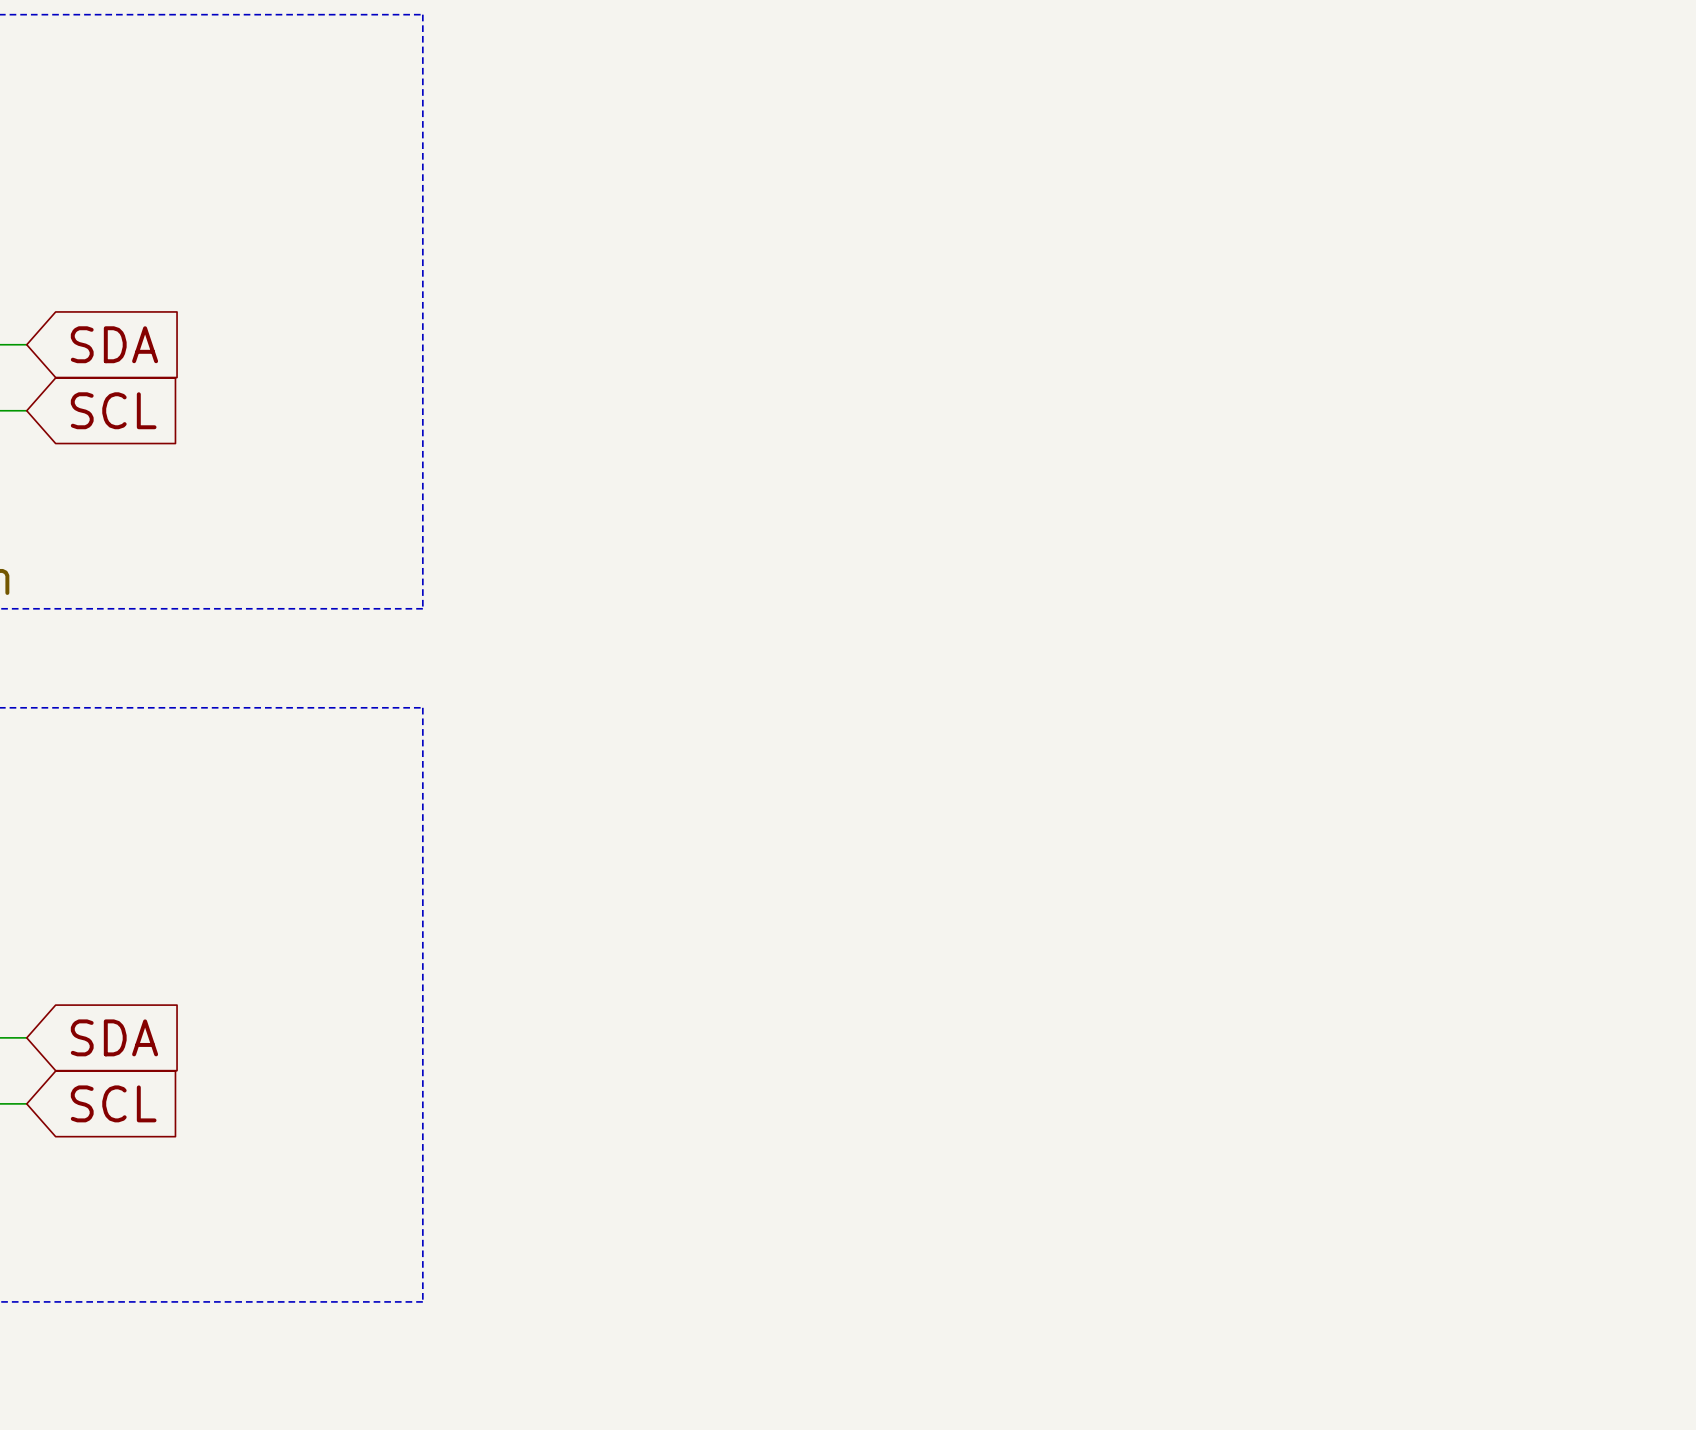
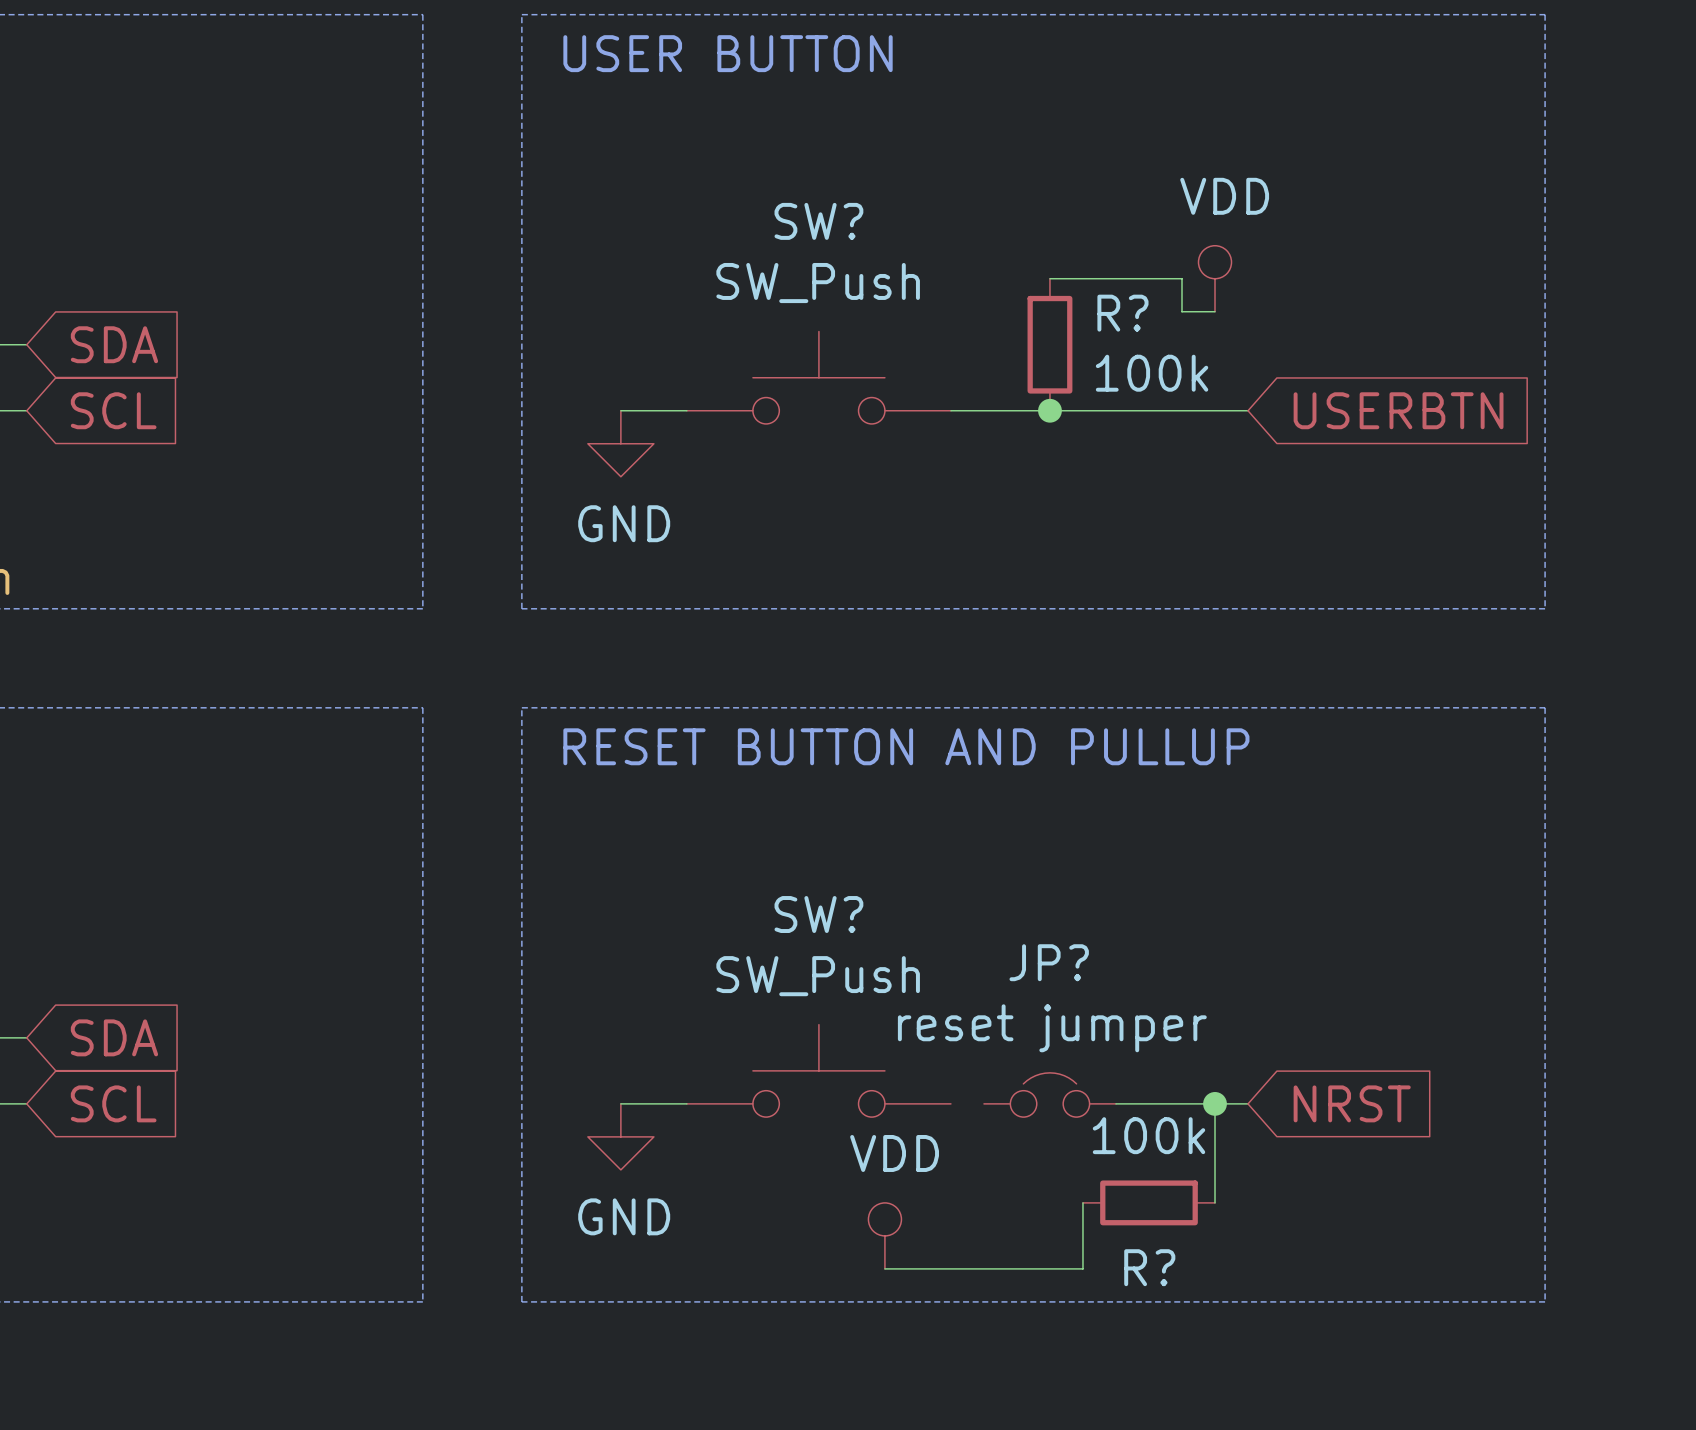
line: none -> (521, 14) (1545, 14) (1545, 608) (521, 608) (521, 14)
text: none -> USER BUTTON (728, 53)
wire: none -> (1049, 278) (1182, 278) (1182, 311) (1215, 311)
power symbol: none -> VDD (1215, 278)
R?: none -> 100k (1049, 344)
SW?: none -> SW_Push (818, 377)
wire: none -> (620, 410) (686, 410)
wire: none -> (950, 410) (1248, 410)
junction: none -> (1049, 410)
global label: none -> USERBTN (1398, 410)
power symbol: none -> GND (620, 443)
line: none -> (521, 707) (521, 1301) (1545, 1301) (1545, 707) (521, 707)
text: none -> RESET BUTTON AND PULLUP (906, 746)
SW?: none -> SW_Push (818, 1070)
JP?: none -> reset jumper (1049, 1094)
wire: none -> (620, 1103) (686, 1103)
wire: none -> (1115, 1103) (1248, 1103)
wire: none -> (1215, 1103) (1215, 1202)
junction: none -> (1215, 1103)
global label: none -> NRST (1352, 1103)
power symbol: none -> GND (620, 1136)
wire: none -> (1082, 1202) (1082, 1268) (884, 1268)
R?: none -> 100k (1148, 1202)
power symbol: none -> VDD (884, 1235)

